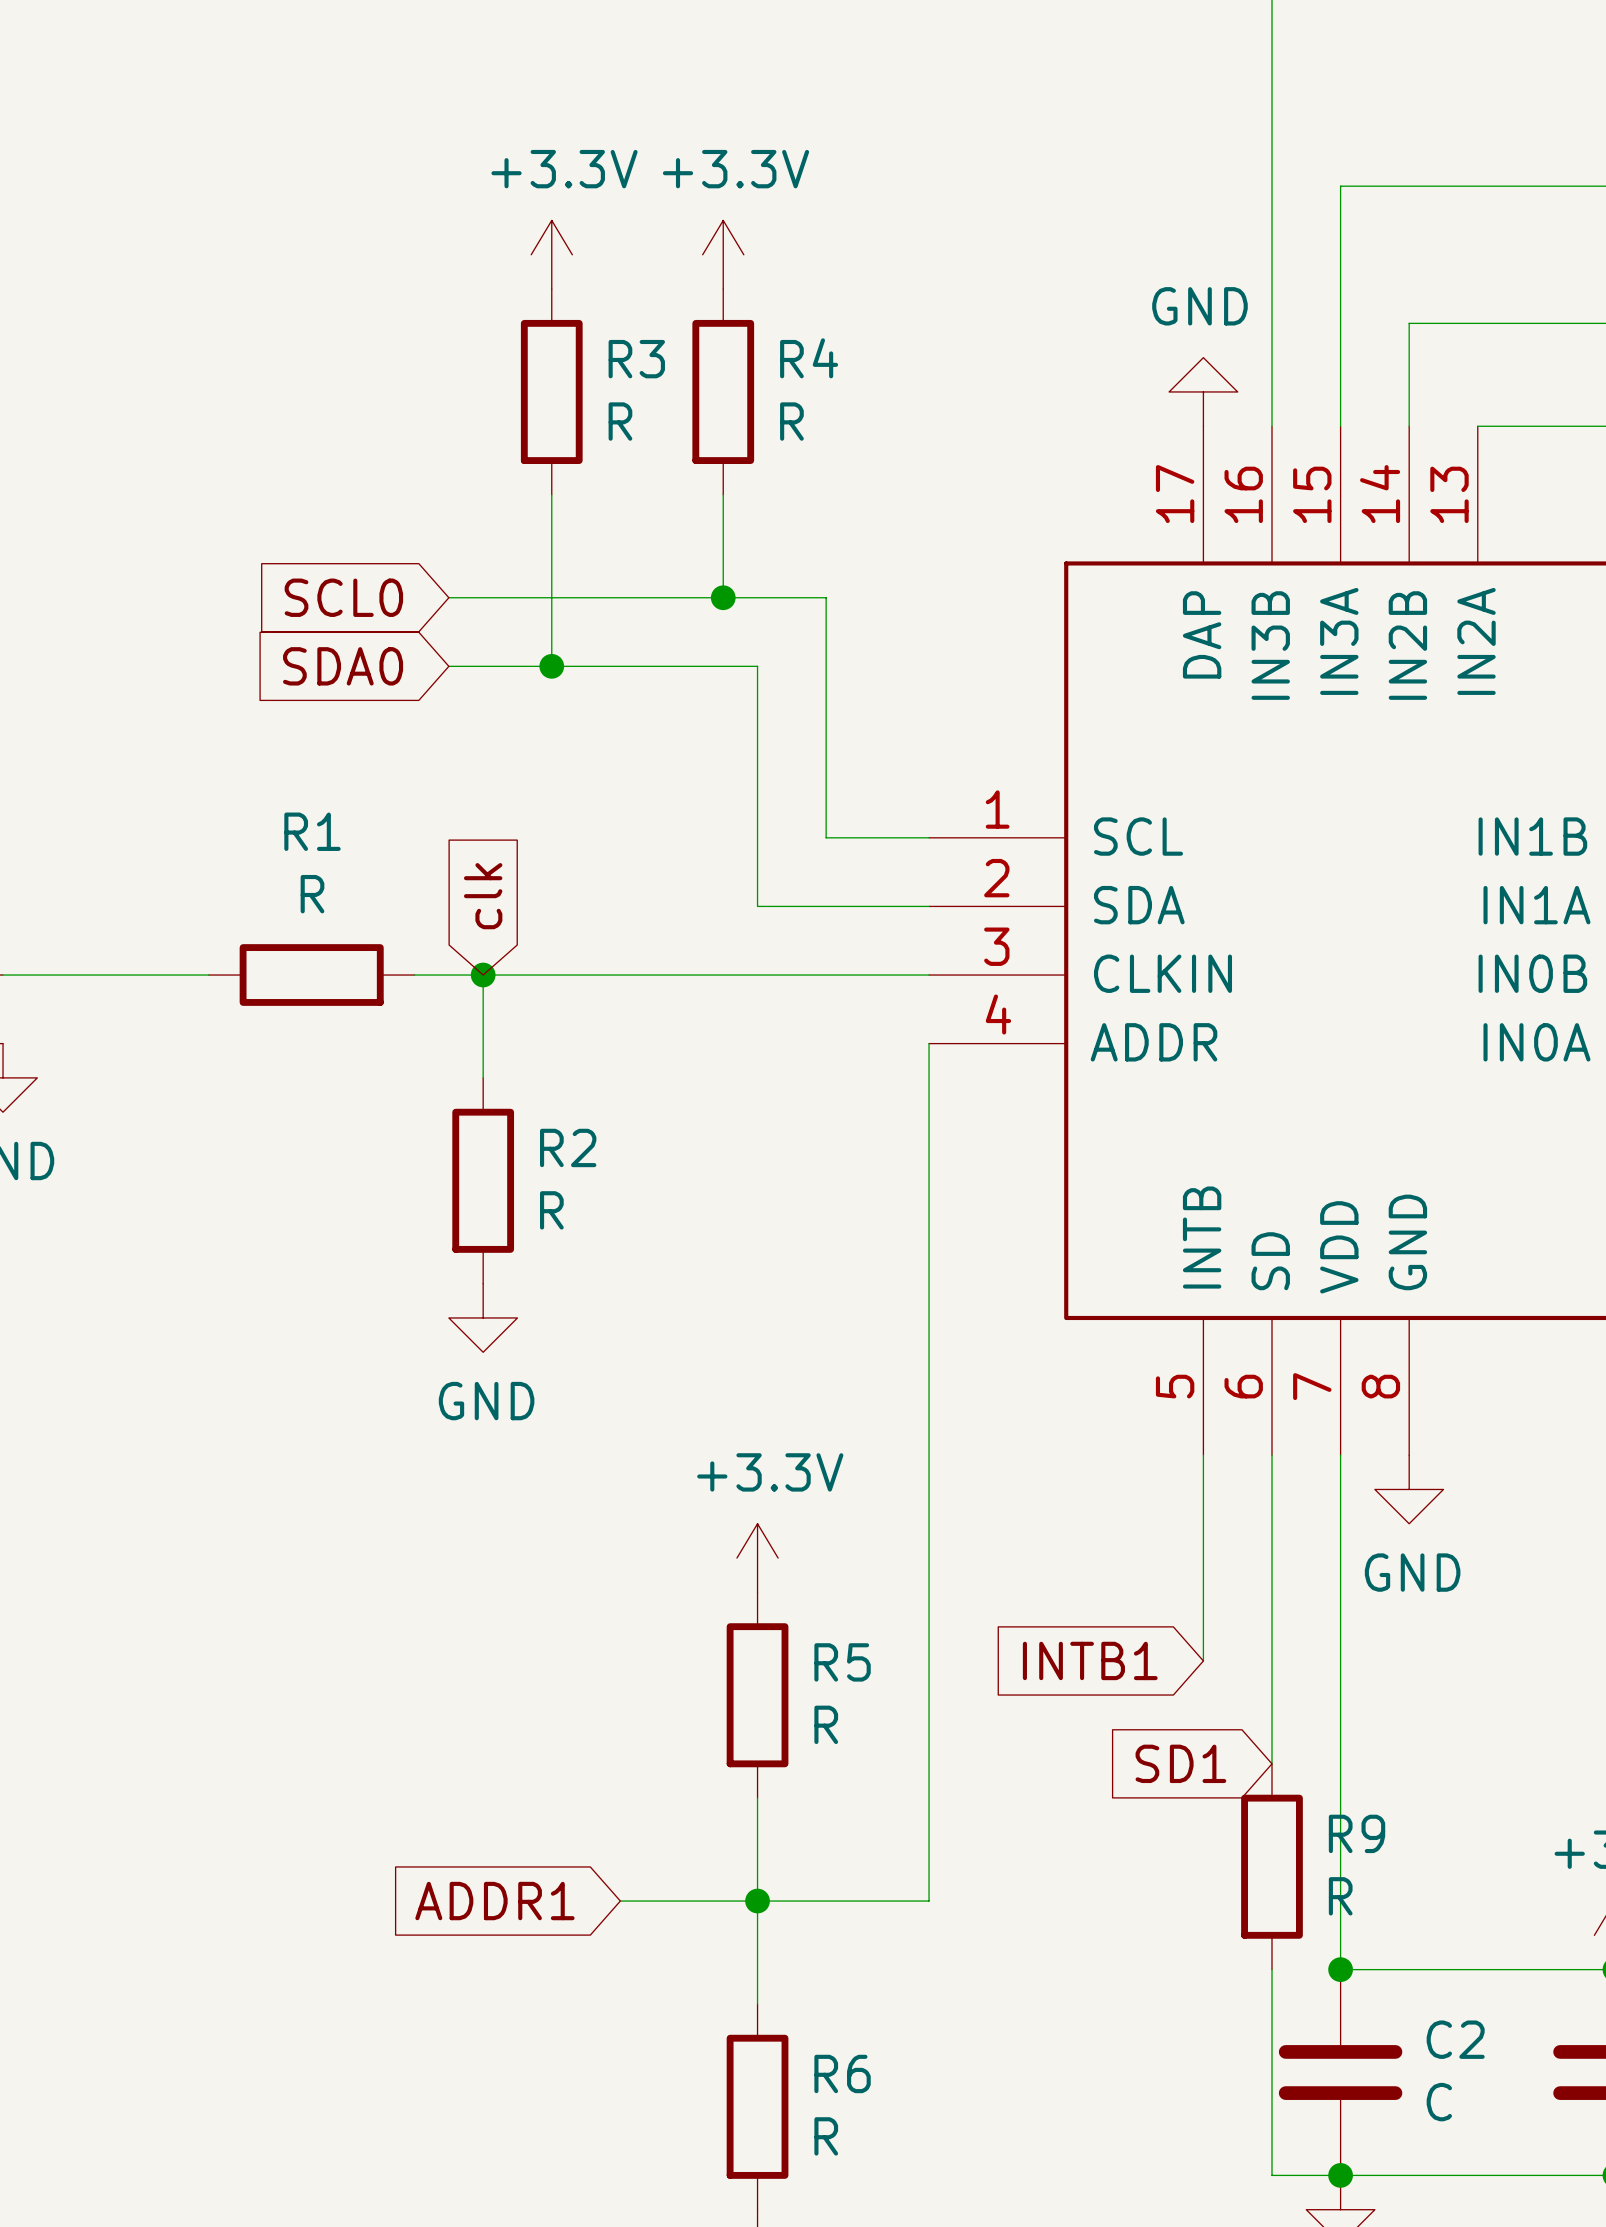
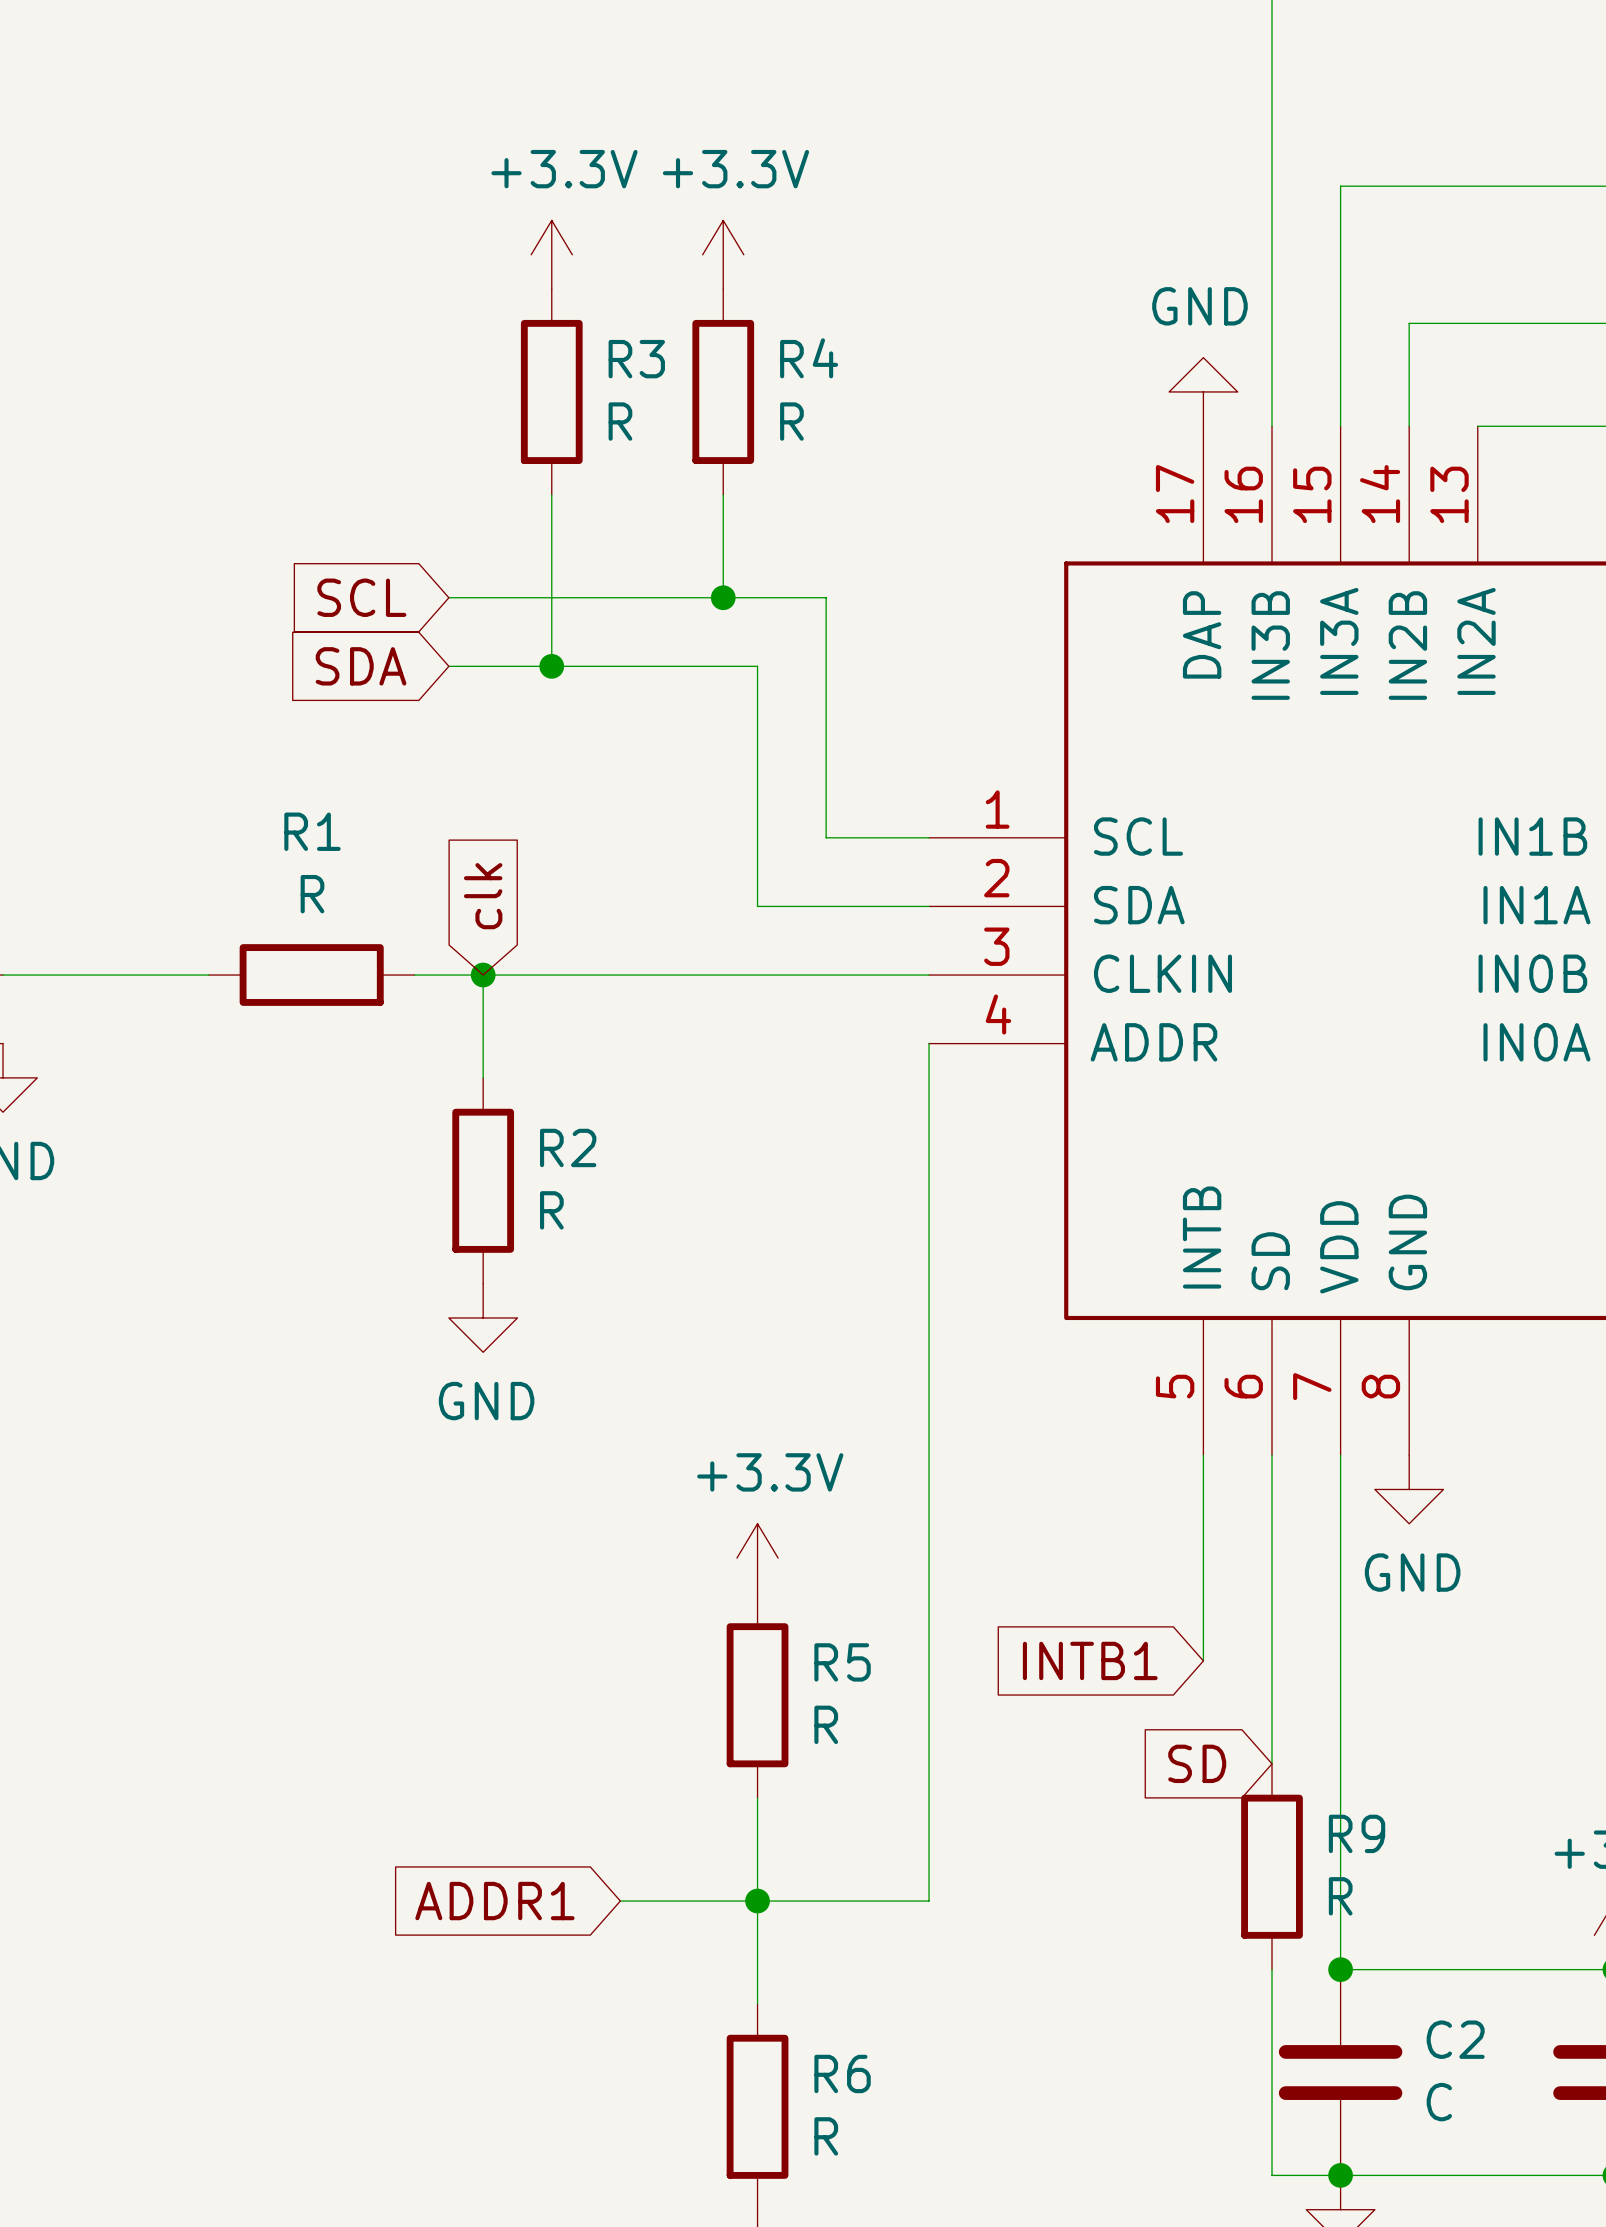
global label: SCL0 (343, 597) -> SCL (361, 597)
global label: SDA0 (343, 666) -> SDA (361, 666)
global label: SD1 (1180, 1763) -> SD (1197, 1763)

